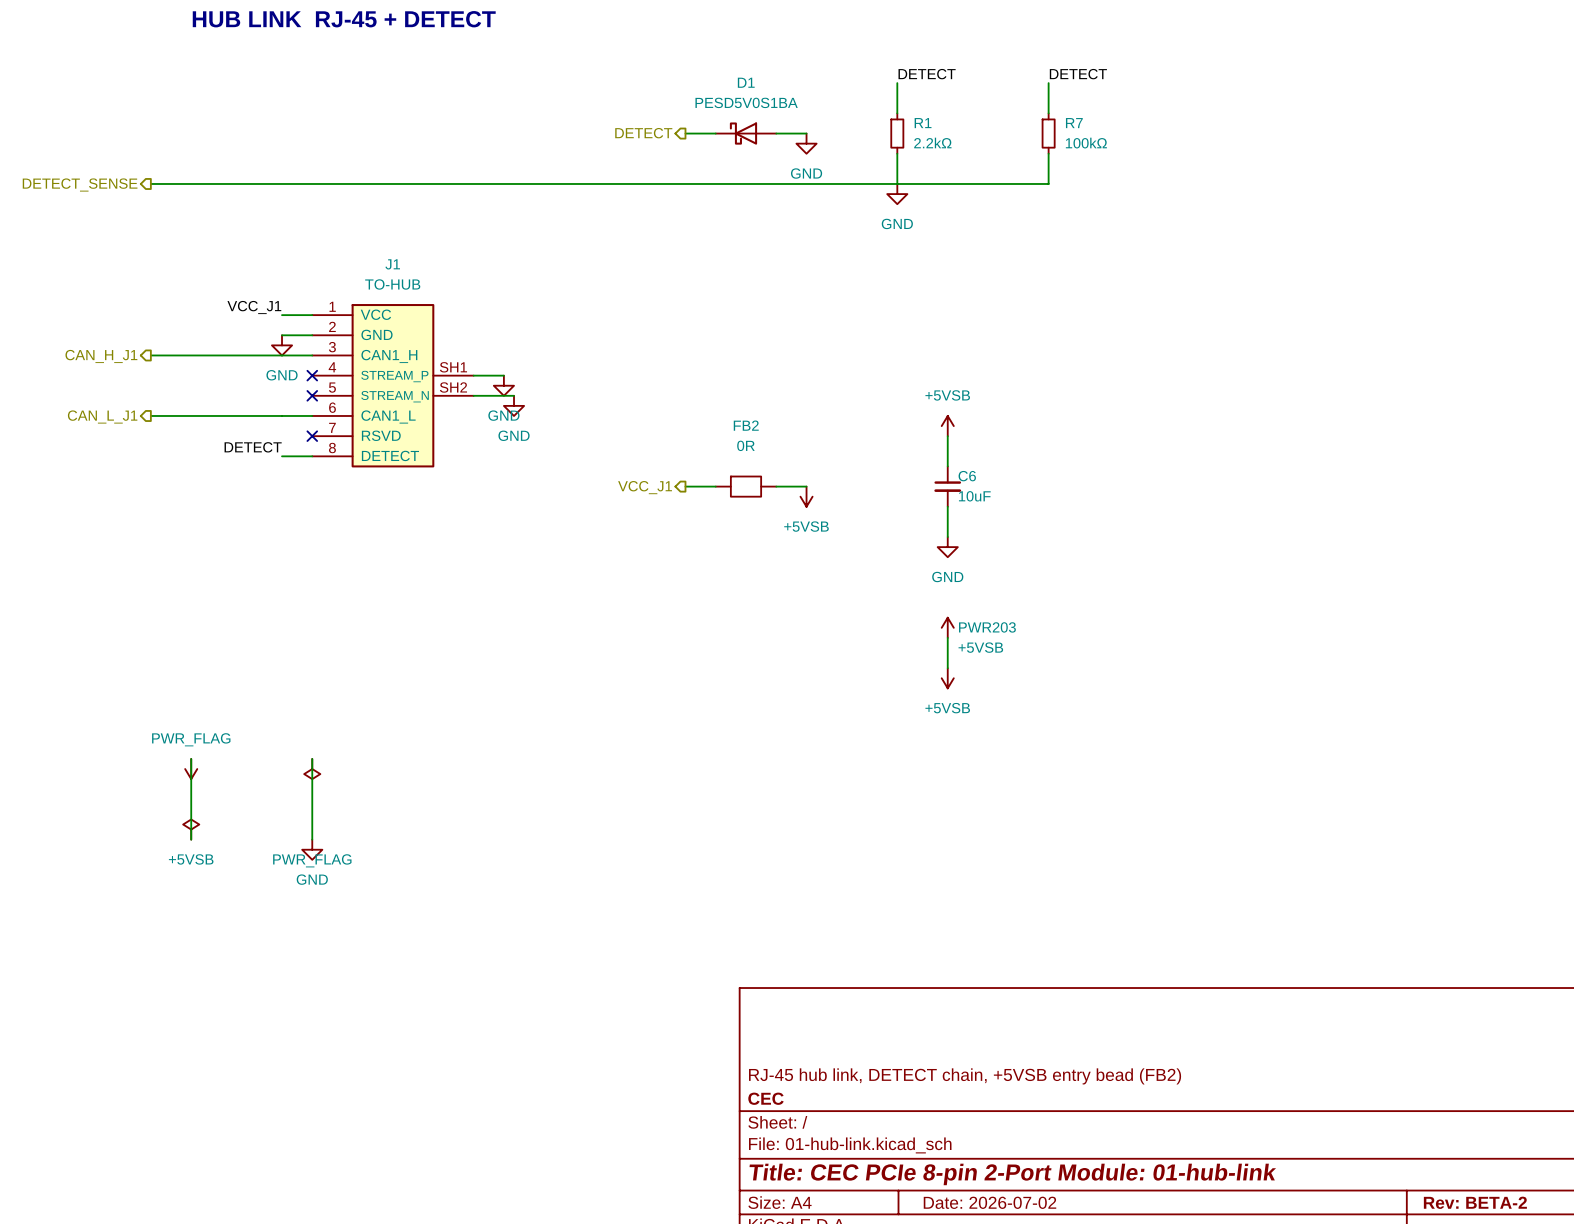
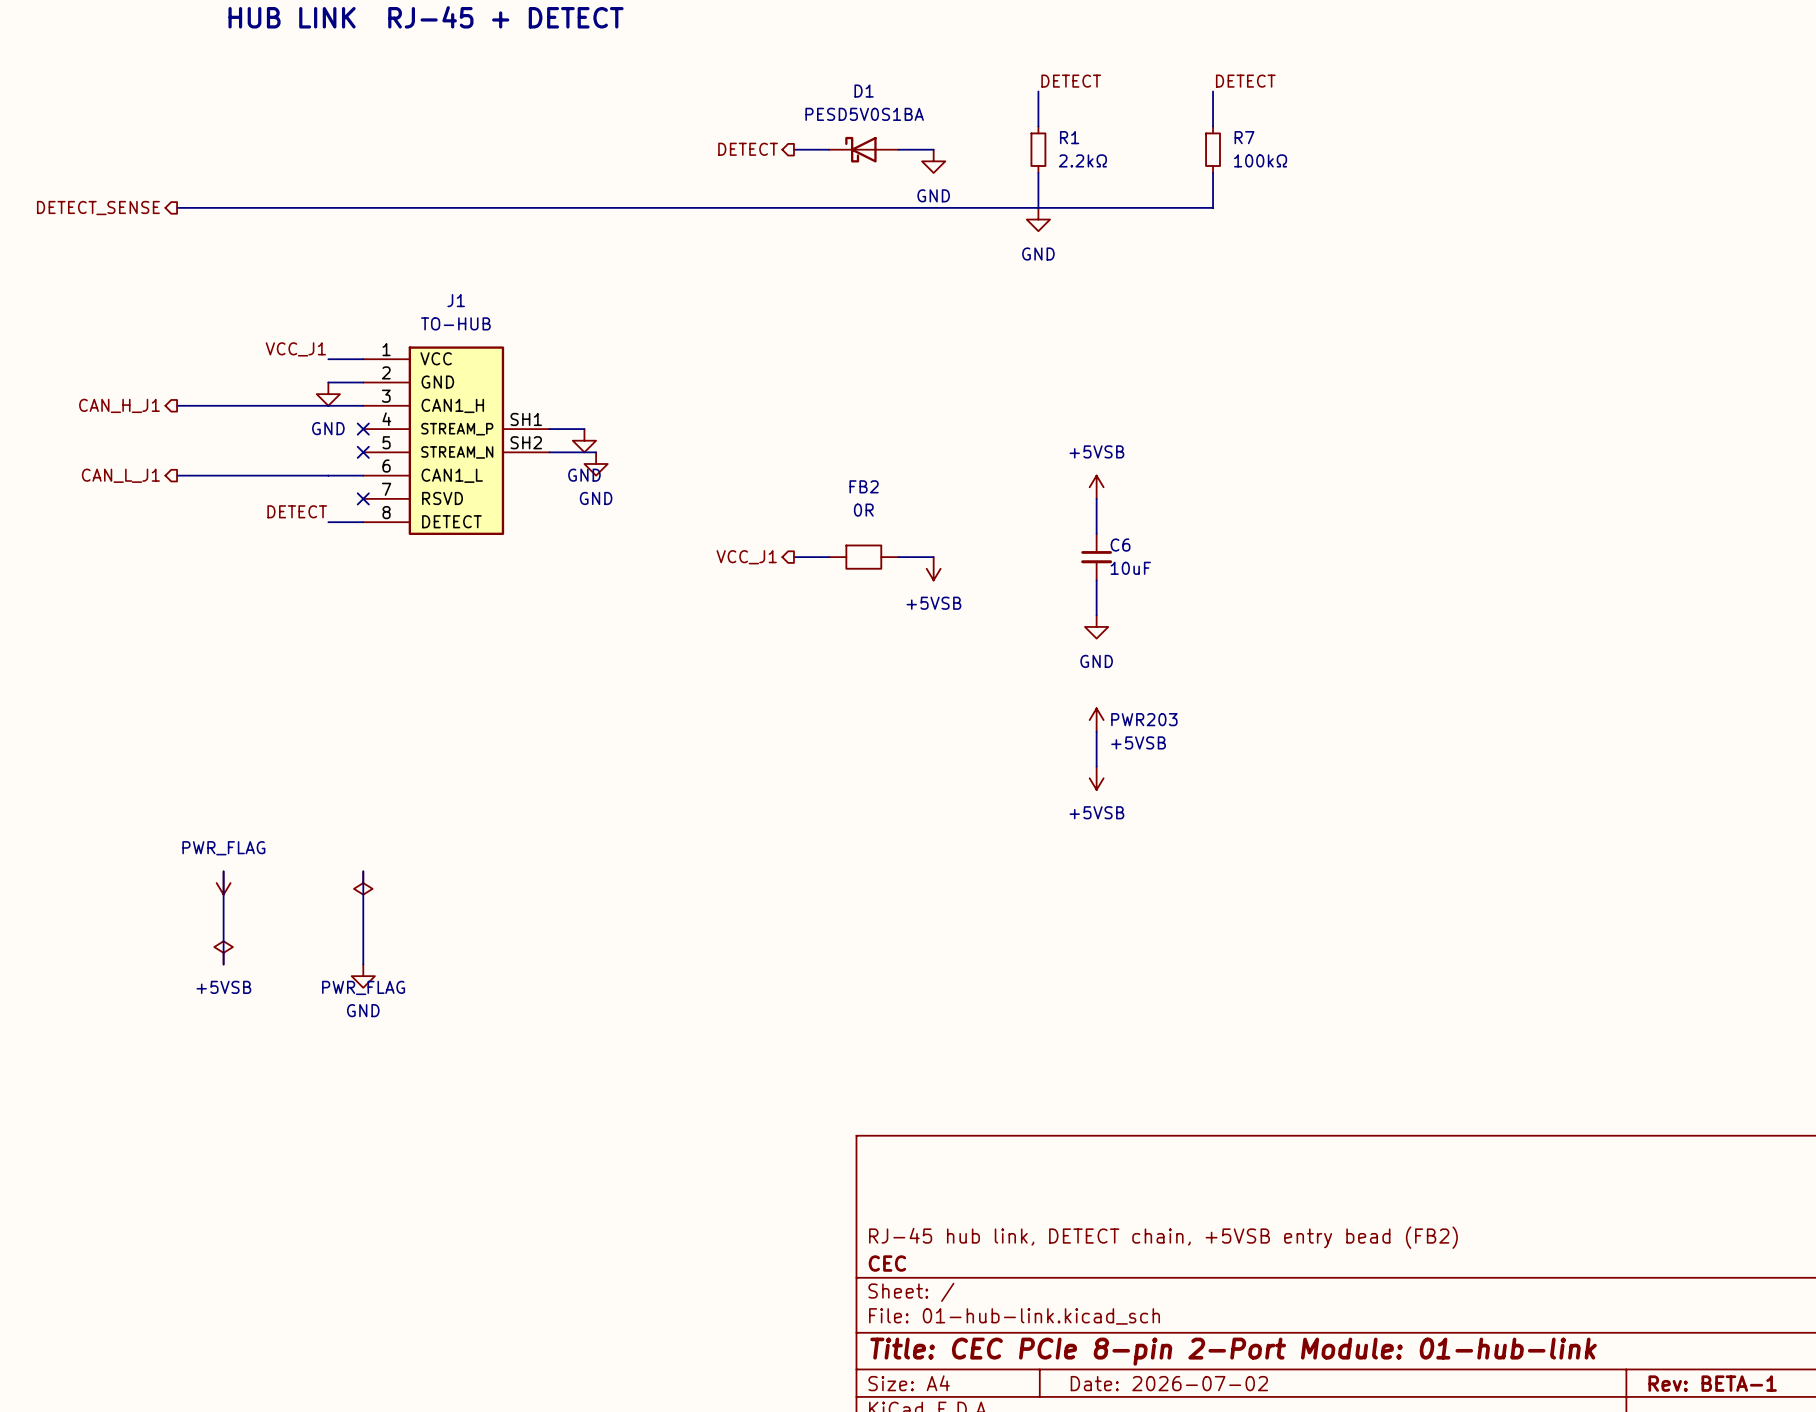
title block: Rev: BETA-2 (1475, 1202) -> Rev: BETA-1 (1712, 1383)

